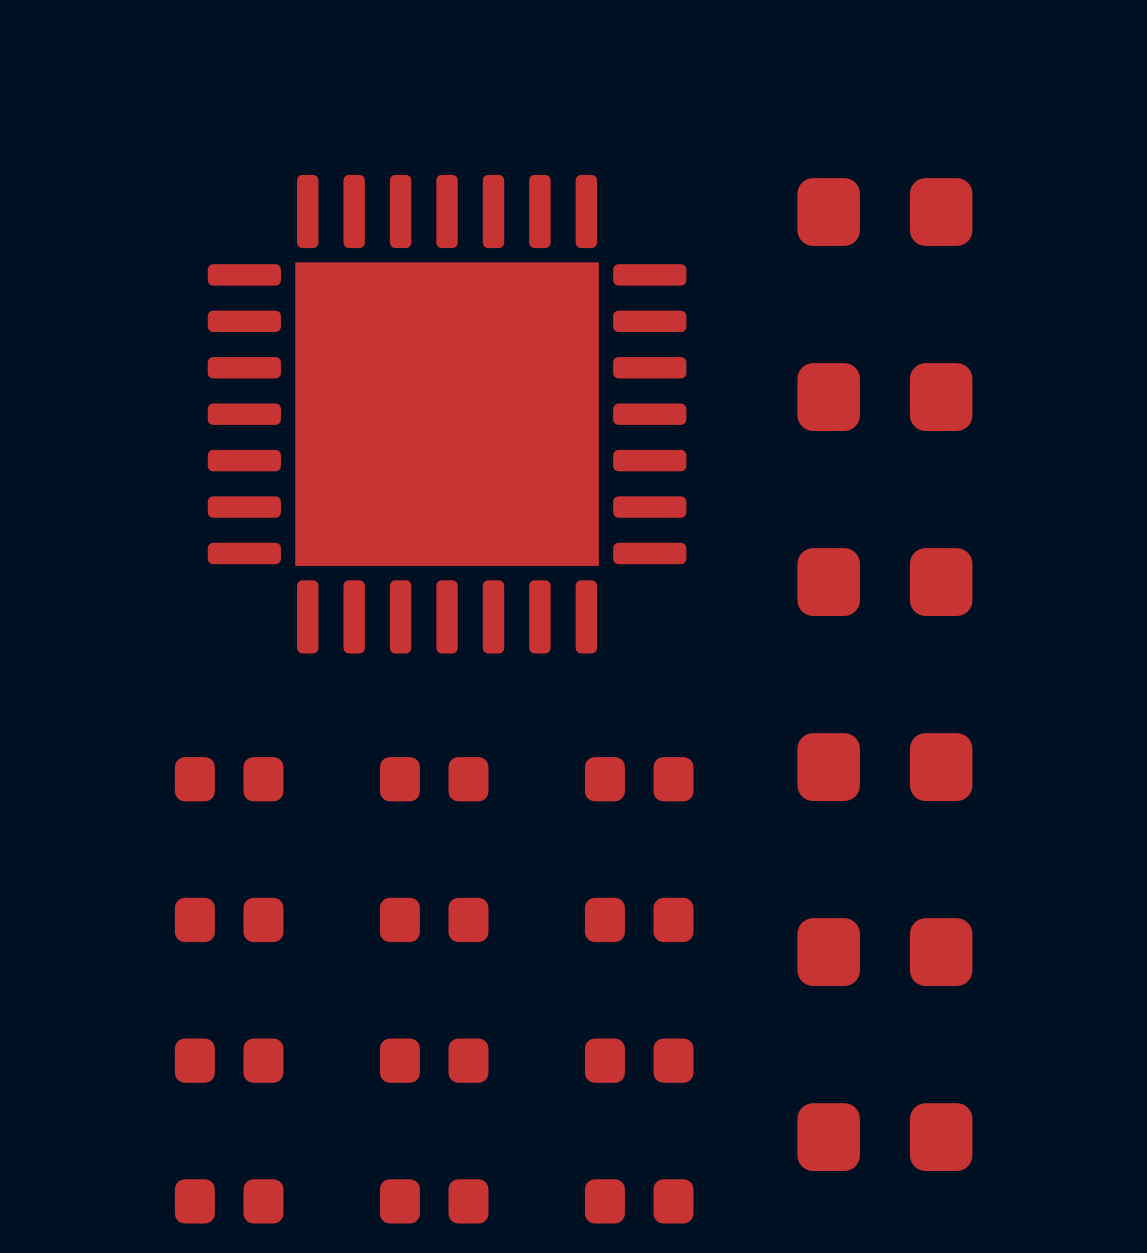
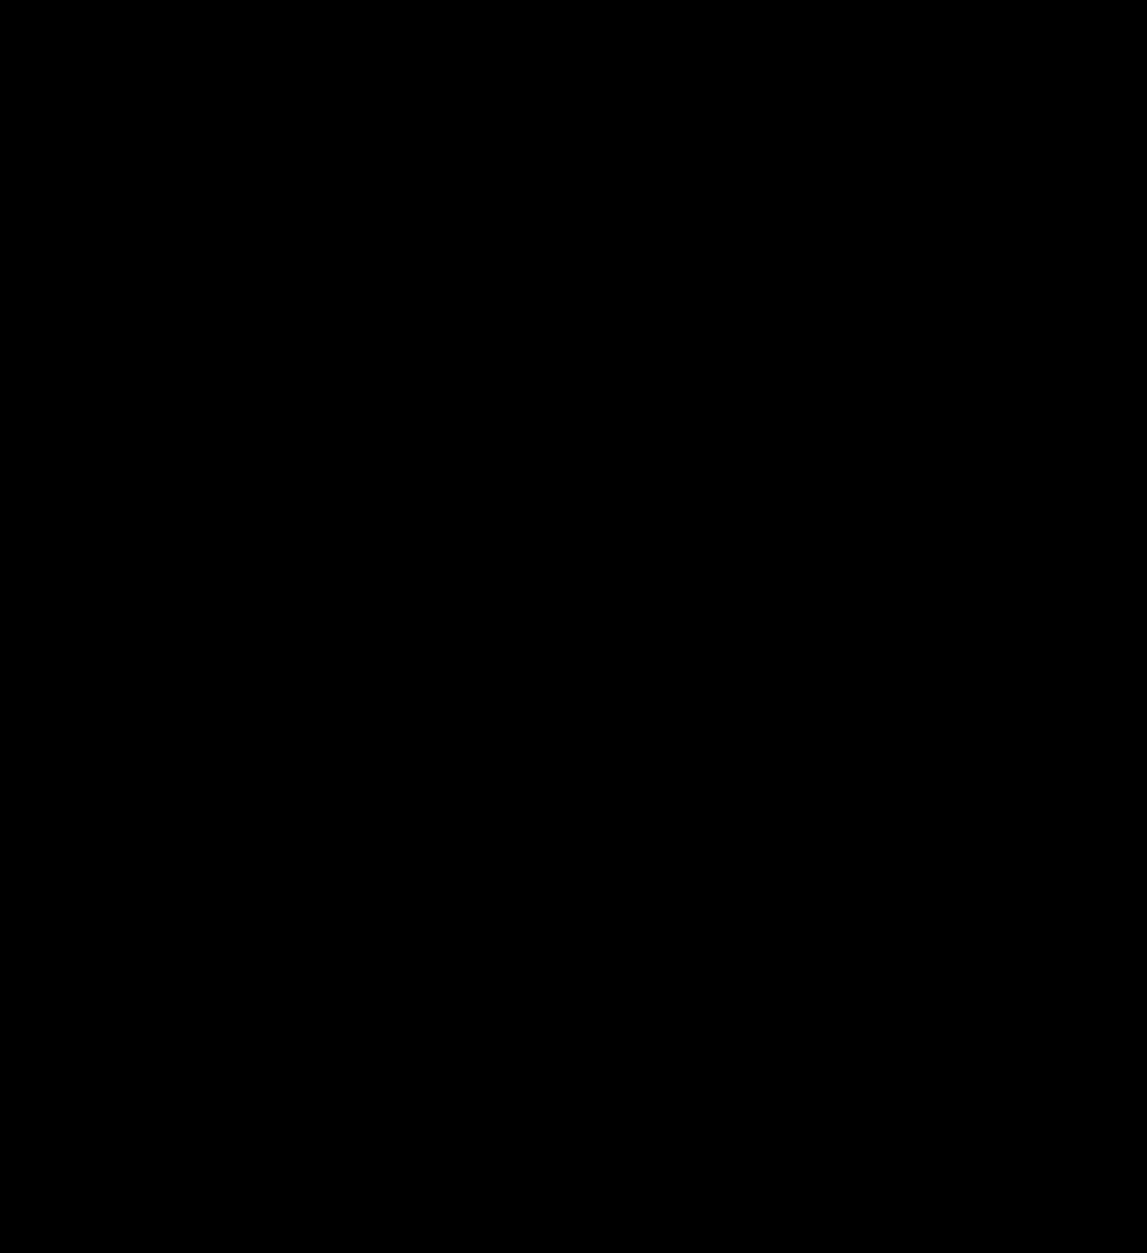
part: (884, 212) -> none
part: (884, 397) -> none
part: (447, 414) -> none
part: (884, 582) -> none
part: (884, 767) -> none
part: (229, 779) -> none
part: (434, 779) -> none
part: (639, 779) -> none
part: (229, 919) -> none
part: (434, 919) -> none
part: (639, 919) -> none
part: (884, 952) -> none
part: (229, 1060) -> none
part: (434, 1060) -> none
part: (639, 1060) -> none
part: (884, 1137) -> none
part: (229, 1201) -> none
part: (434, 1201) -> none
part: (639, 1201) -> none

